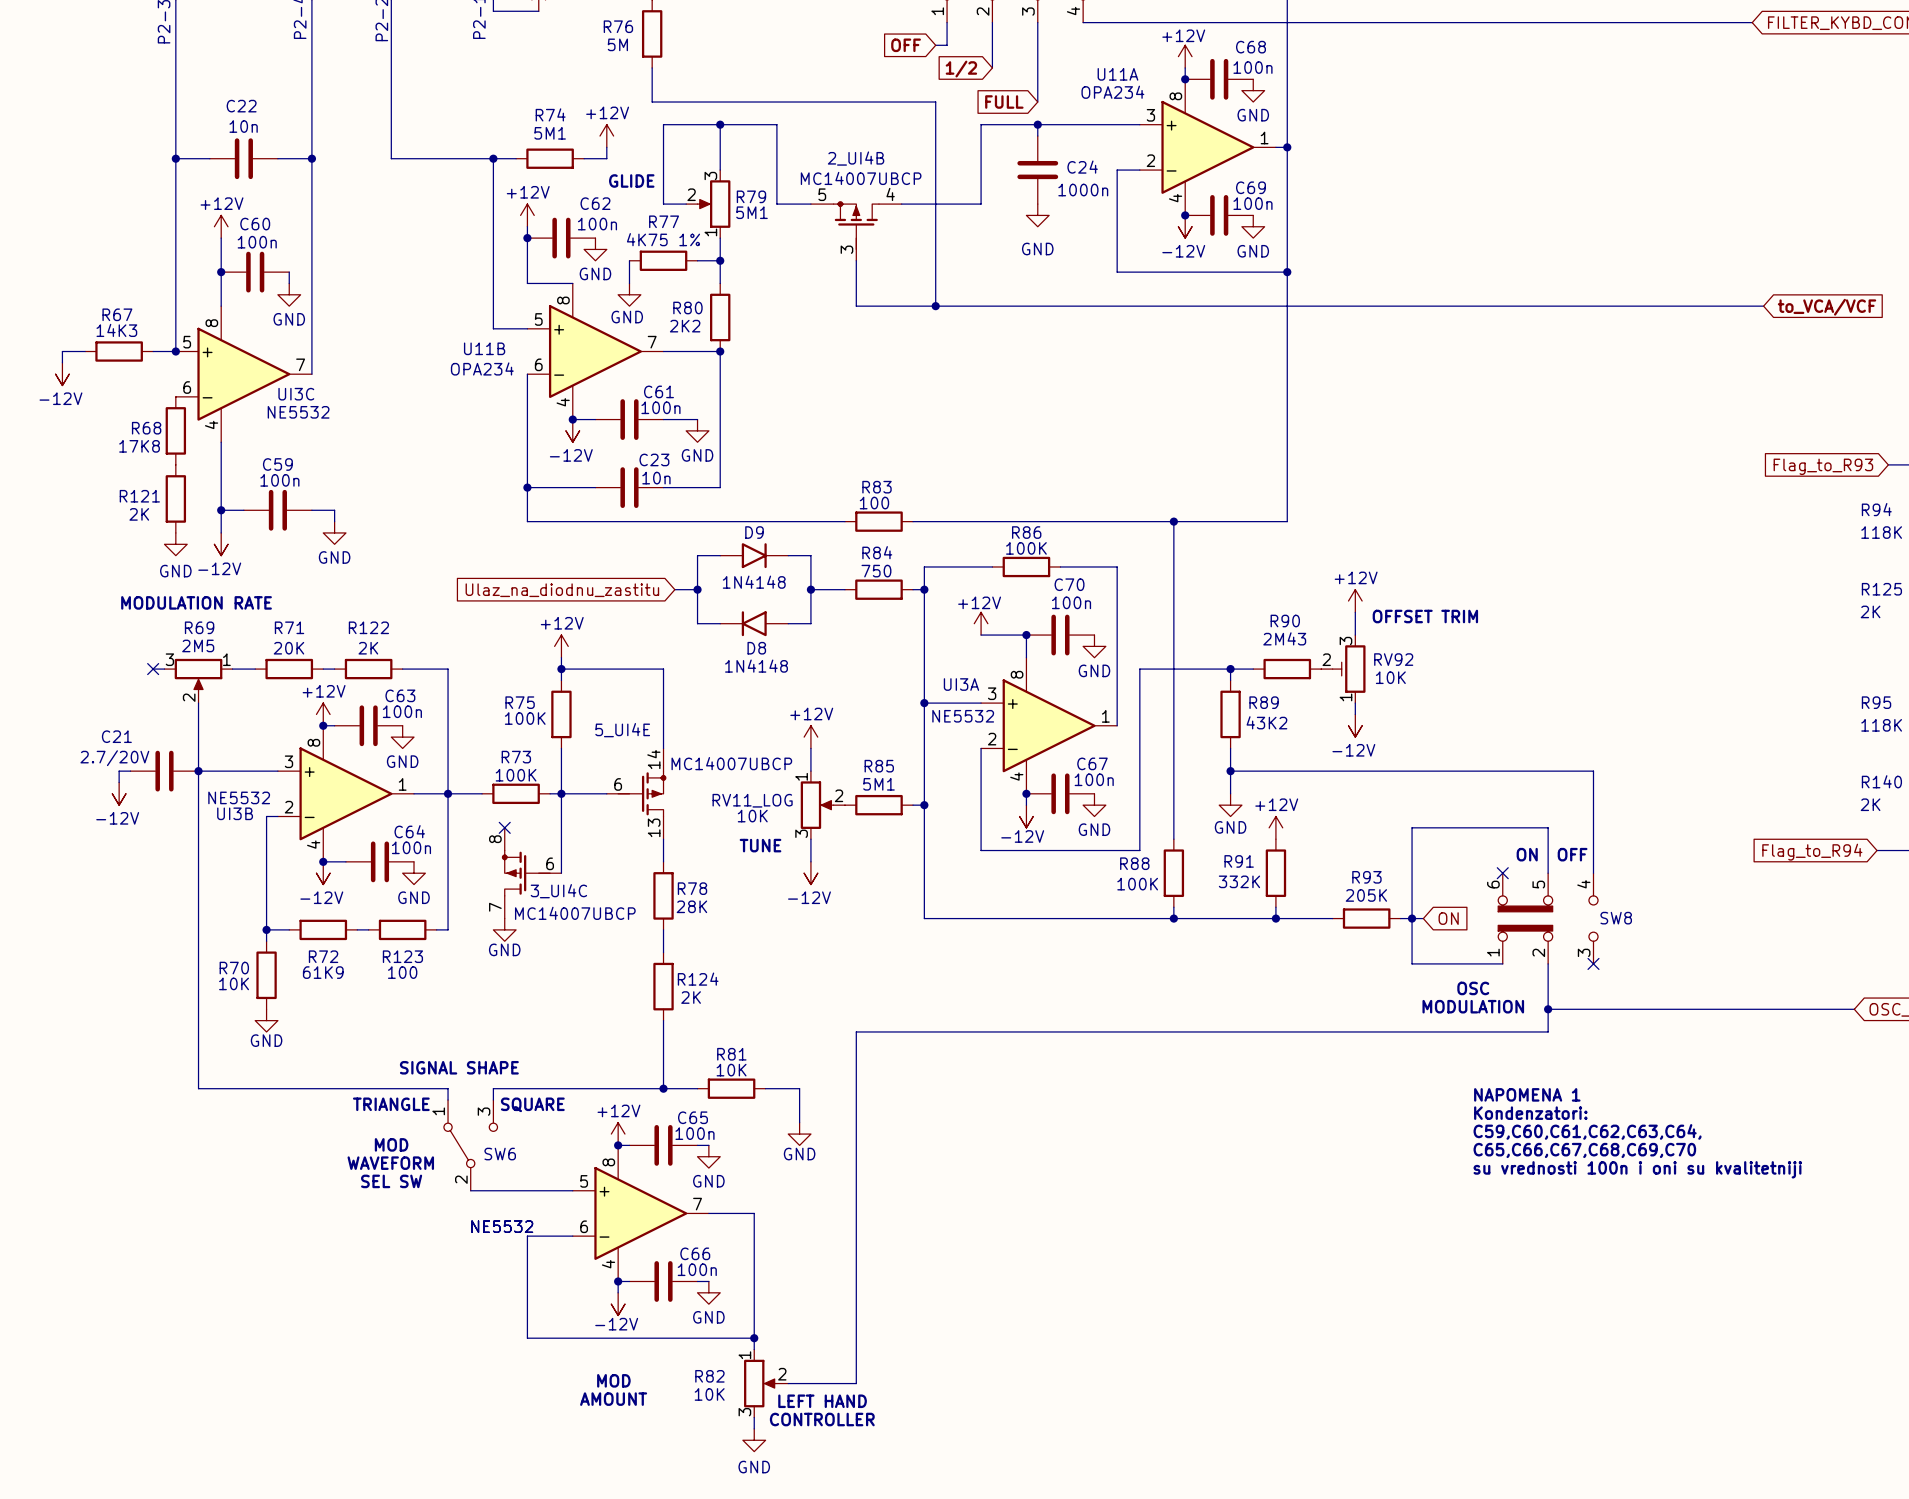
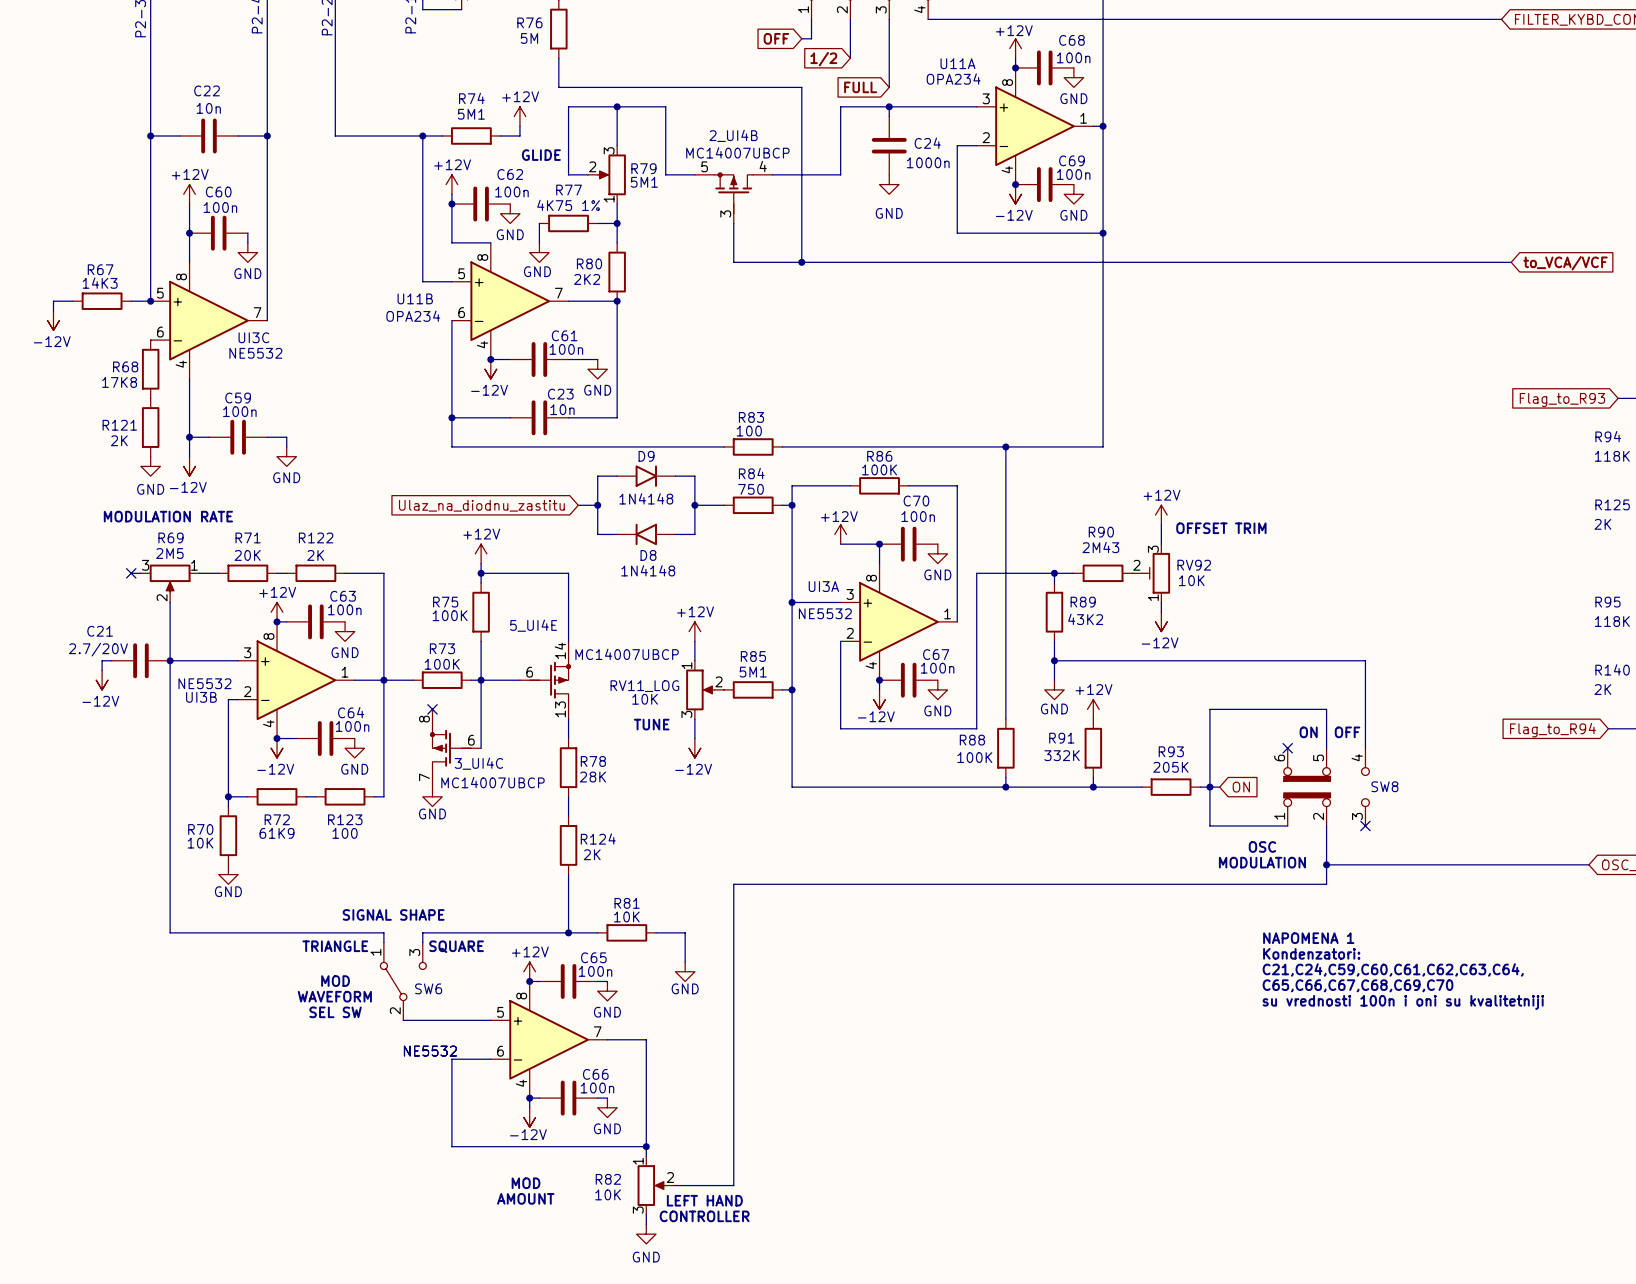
text: C59,C60,C61,C62,C63,C64, (1587, 1131) -> C21,C24,C59,C60,C61,C62,C63,C64, (1393, 969)

